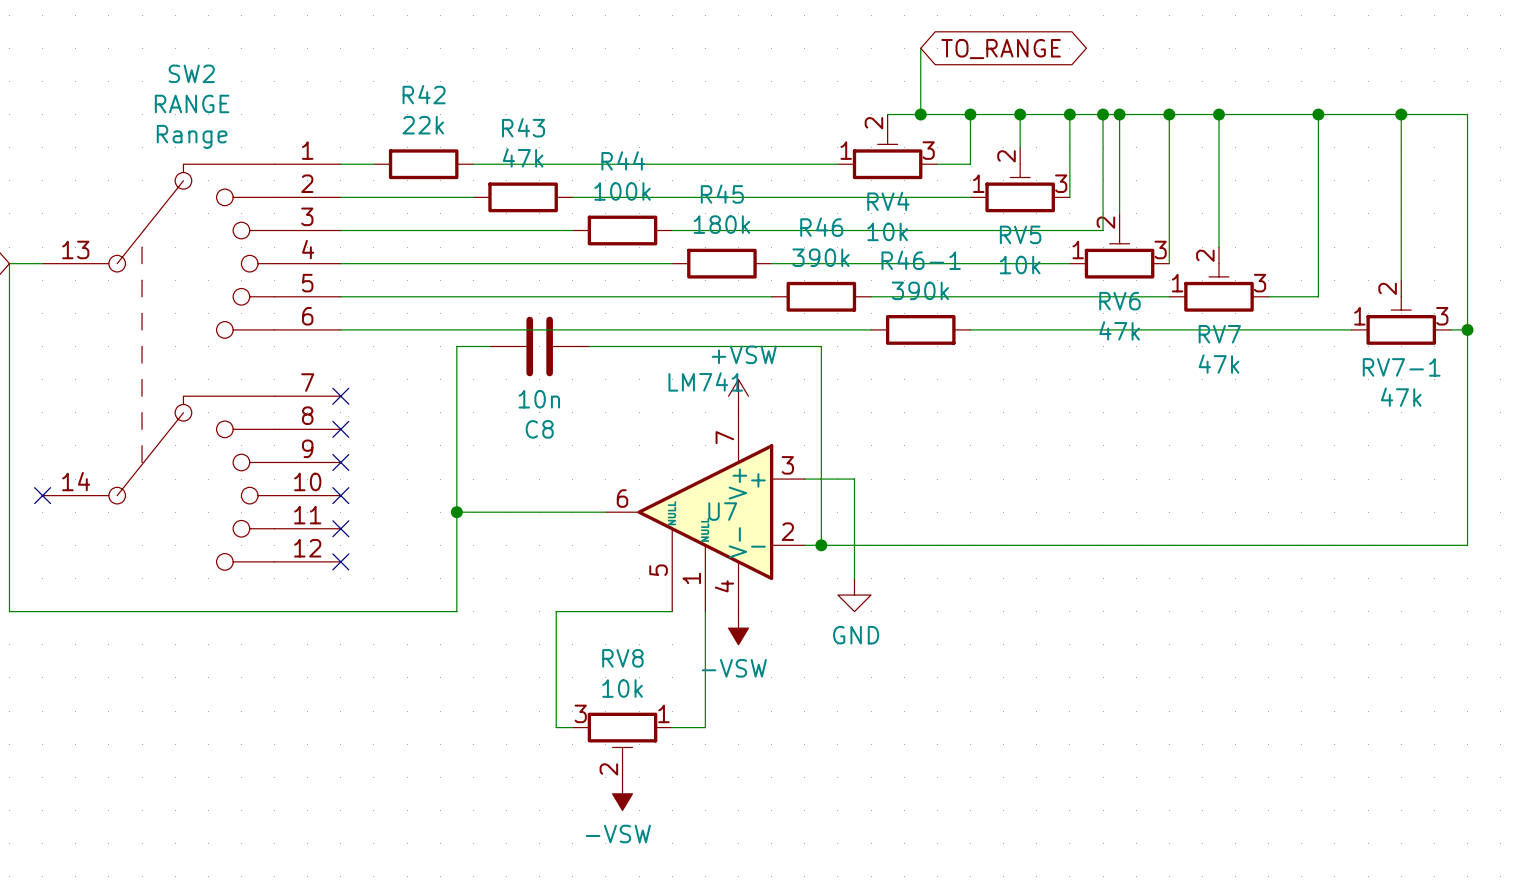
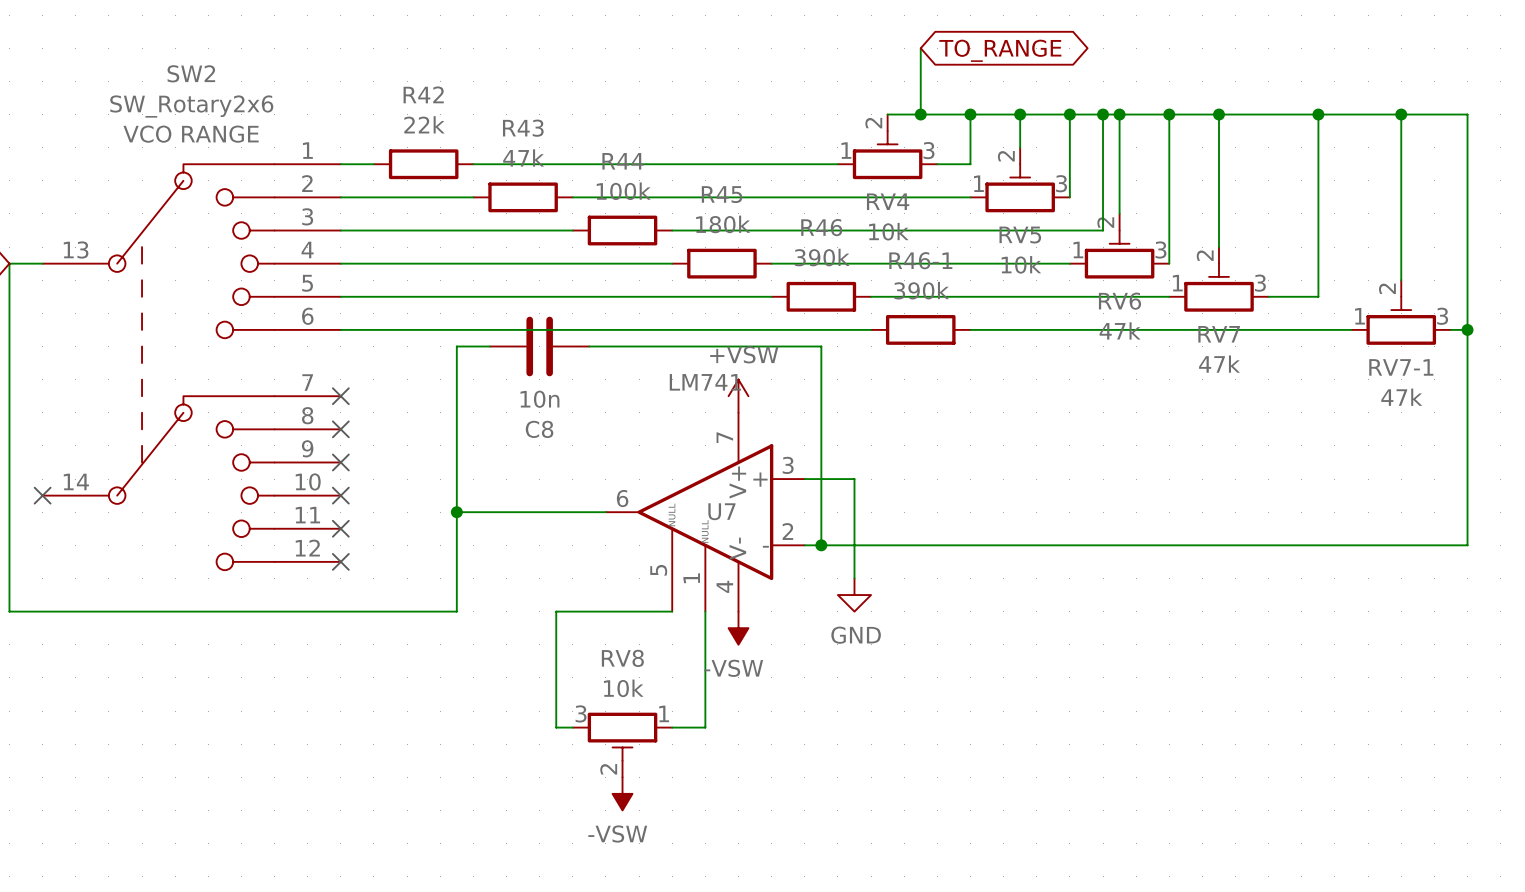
SW2 value: RANGE (192, 103) -> SW_Rotary2x6 (191, 106)
SW2 text: Range (192, 136) -> VCO RANGE (191, 134)

